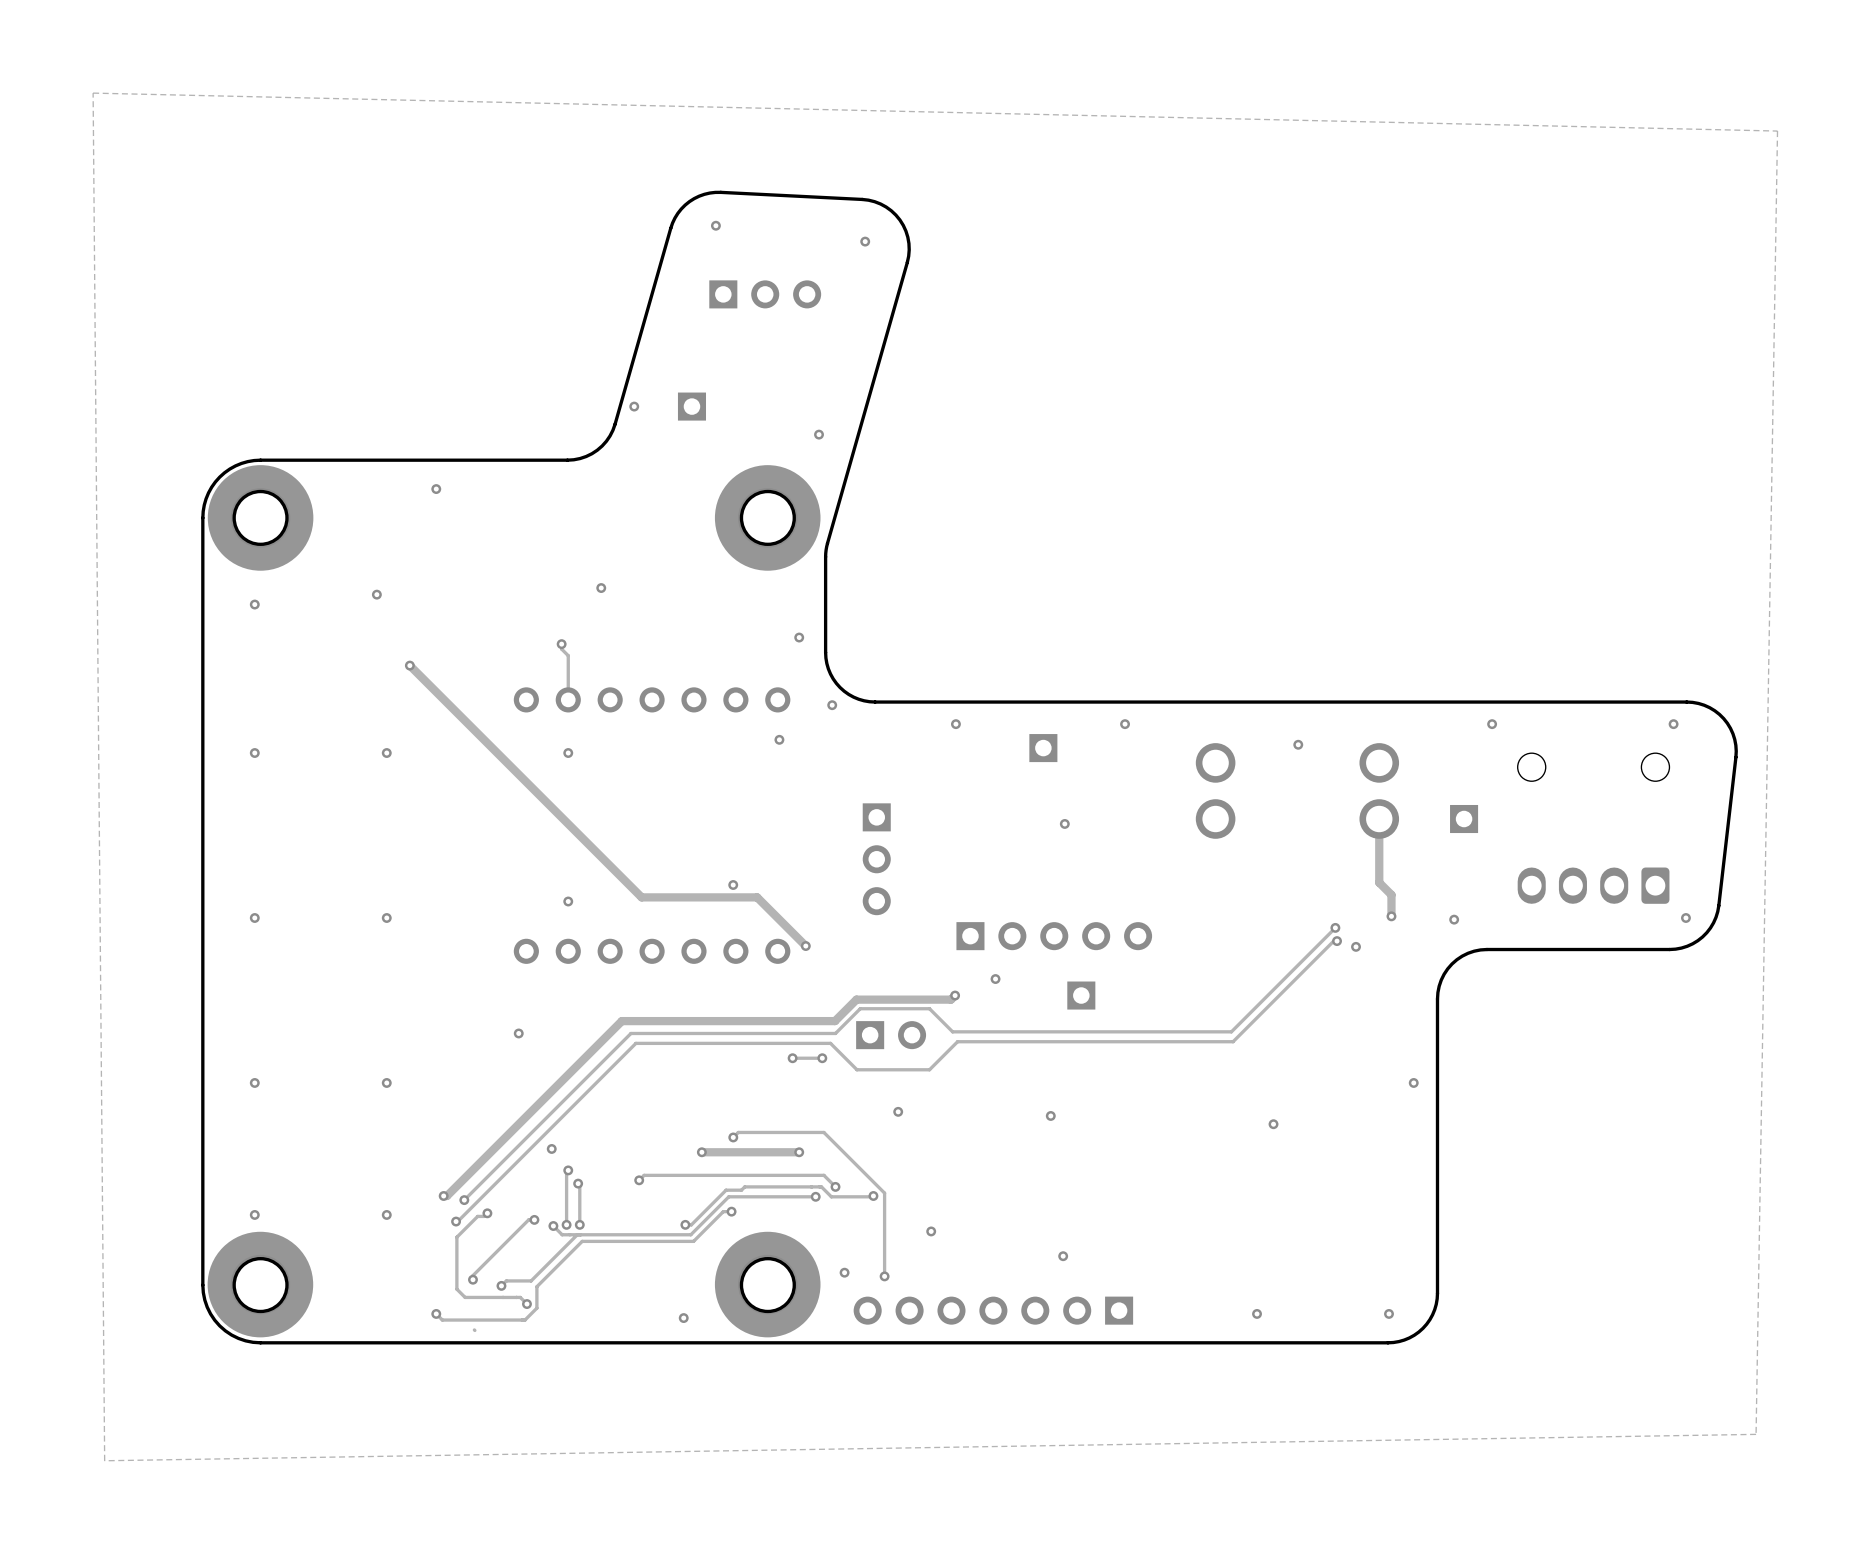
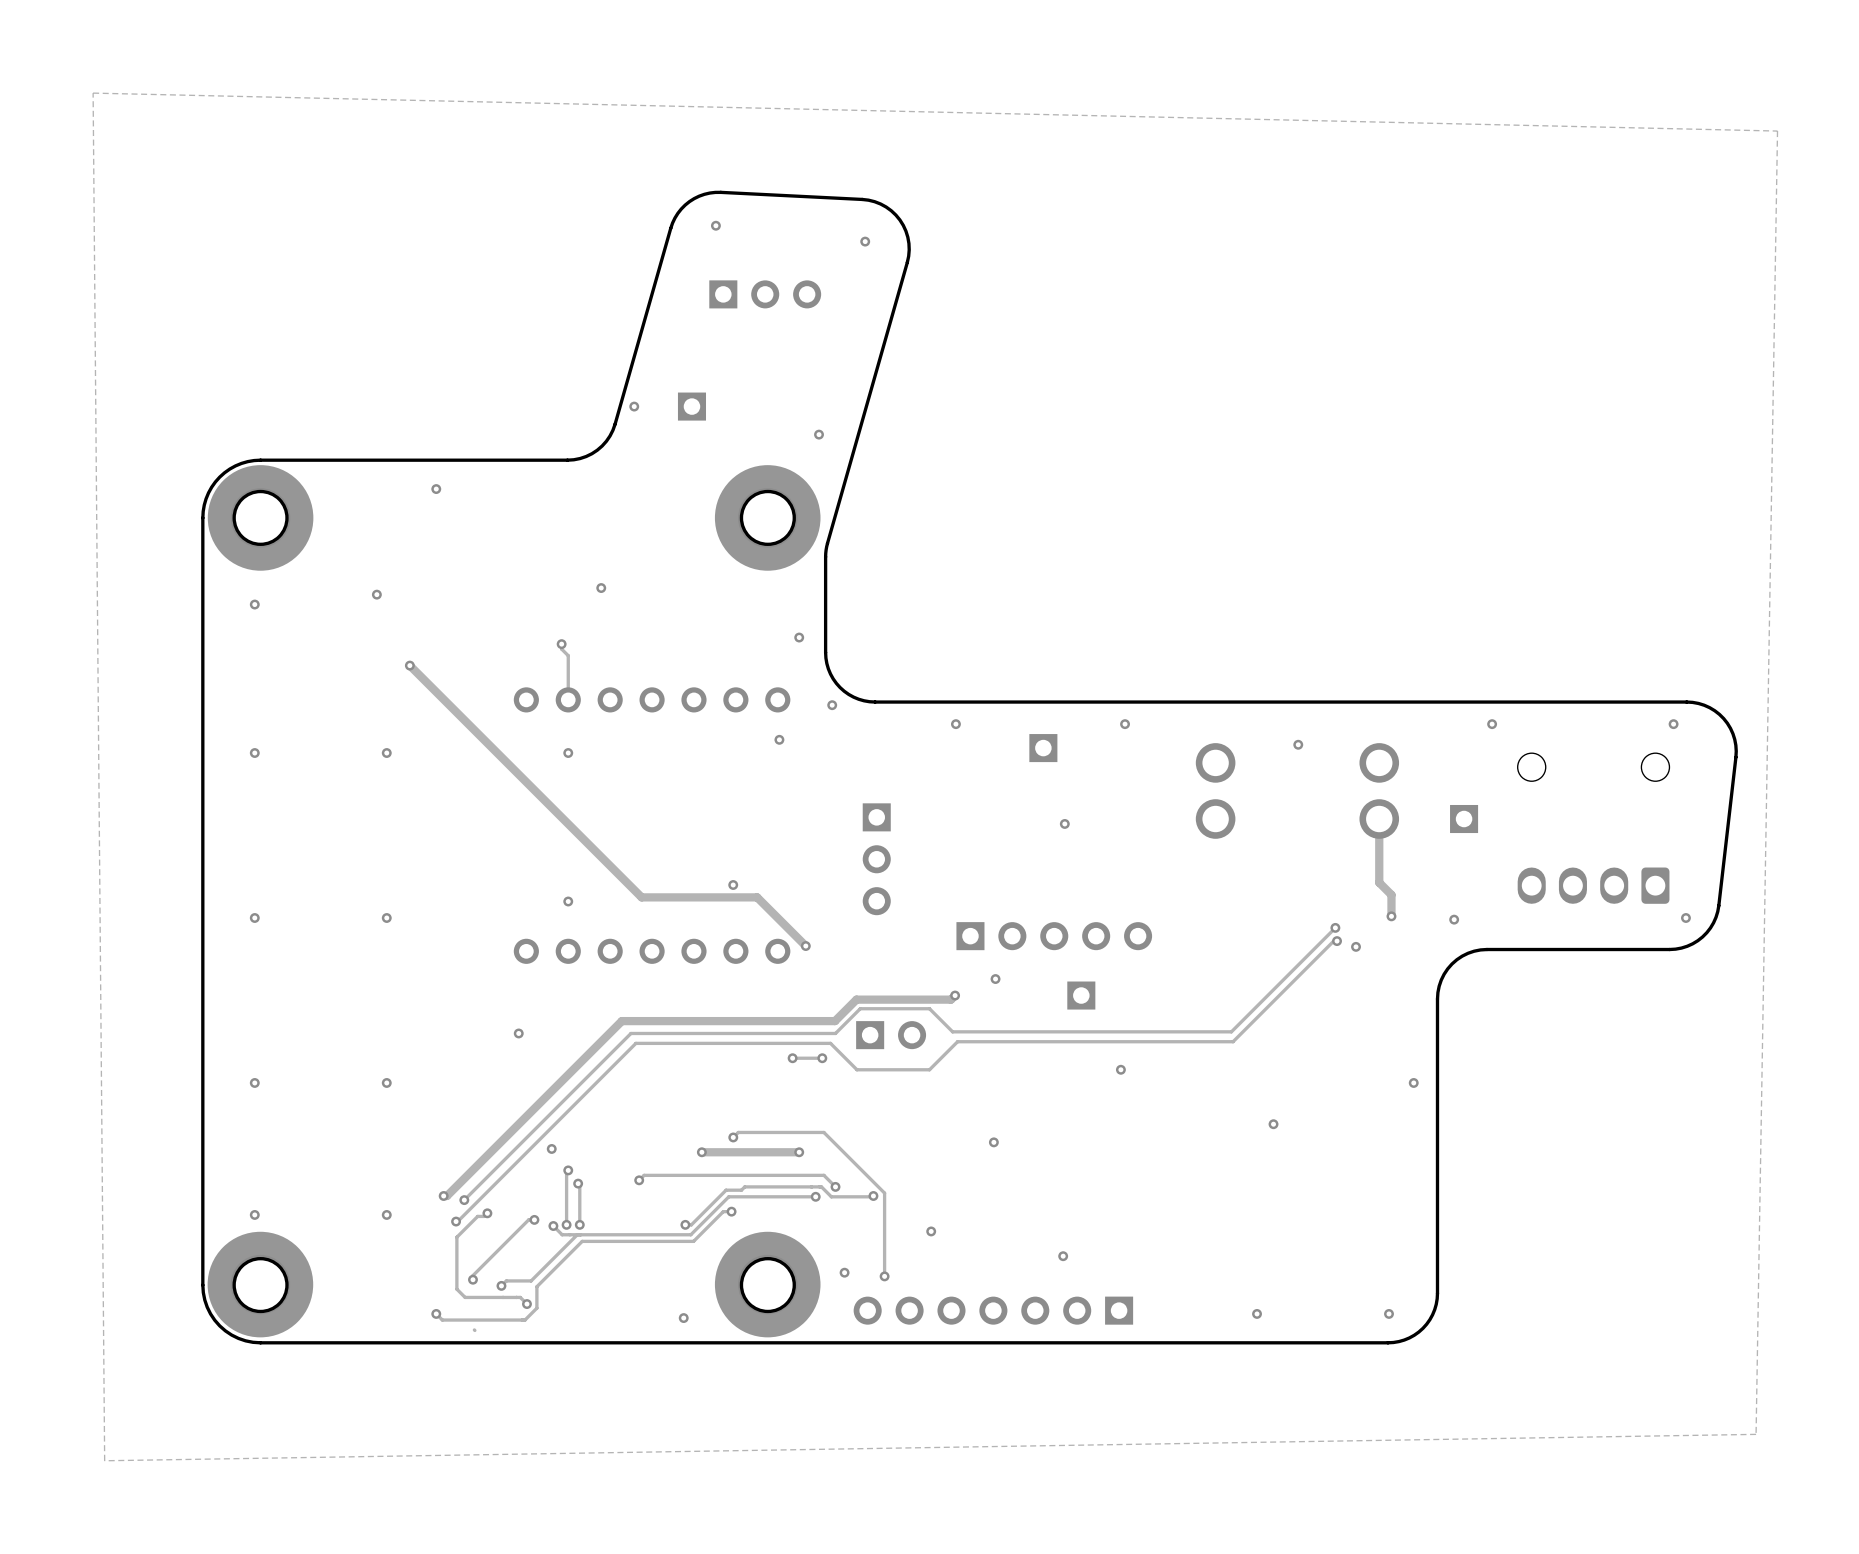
via: none -> (1120, 1069)
via: (898, 1111) -> none
via: (1050, 1115) -> none
via: none -> (993, 1142)

